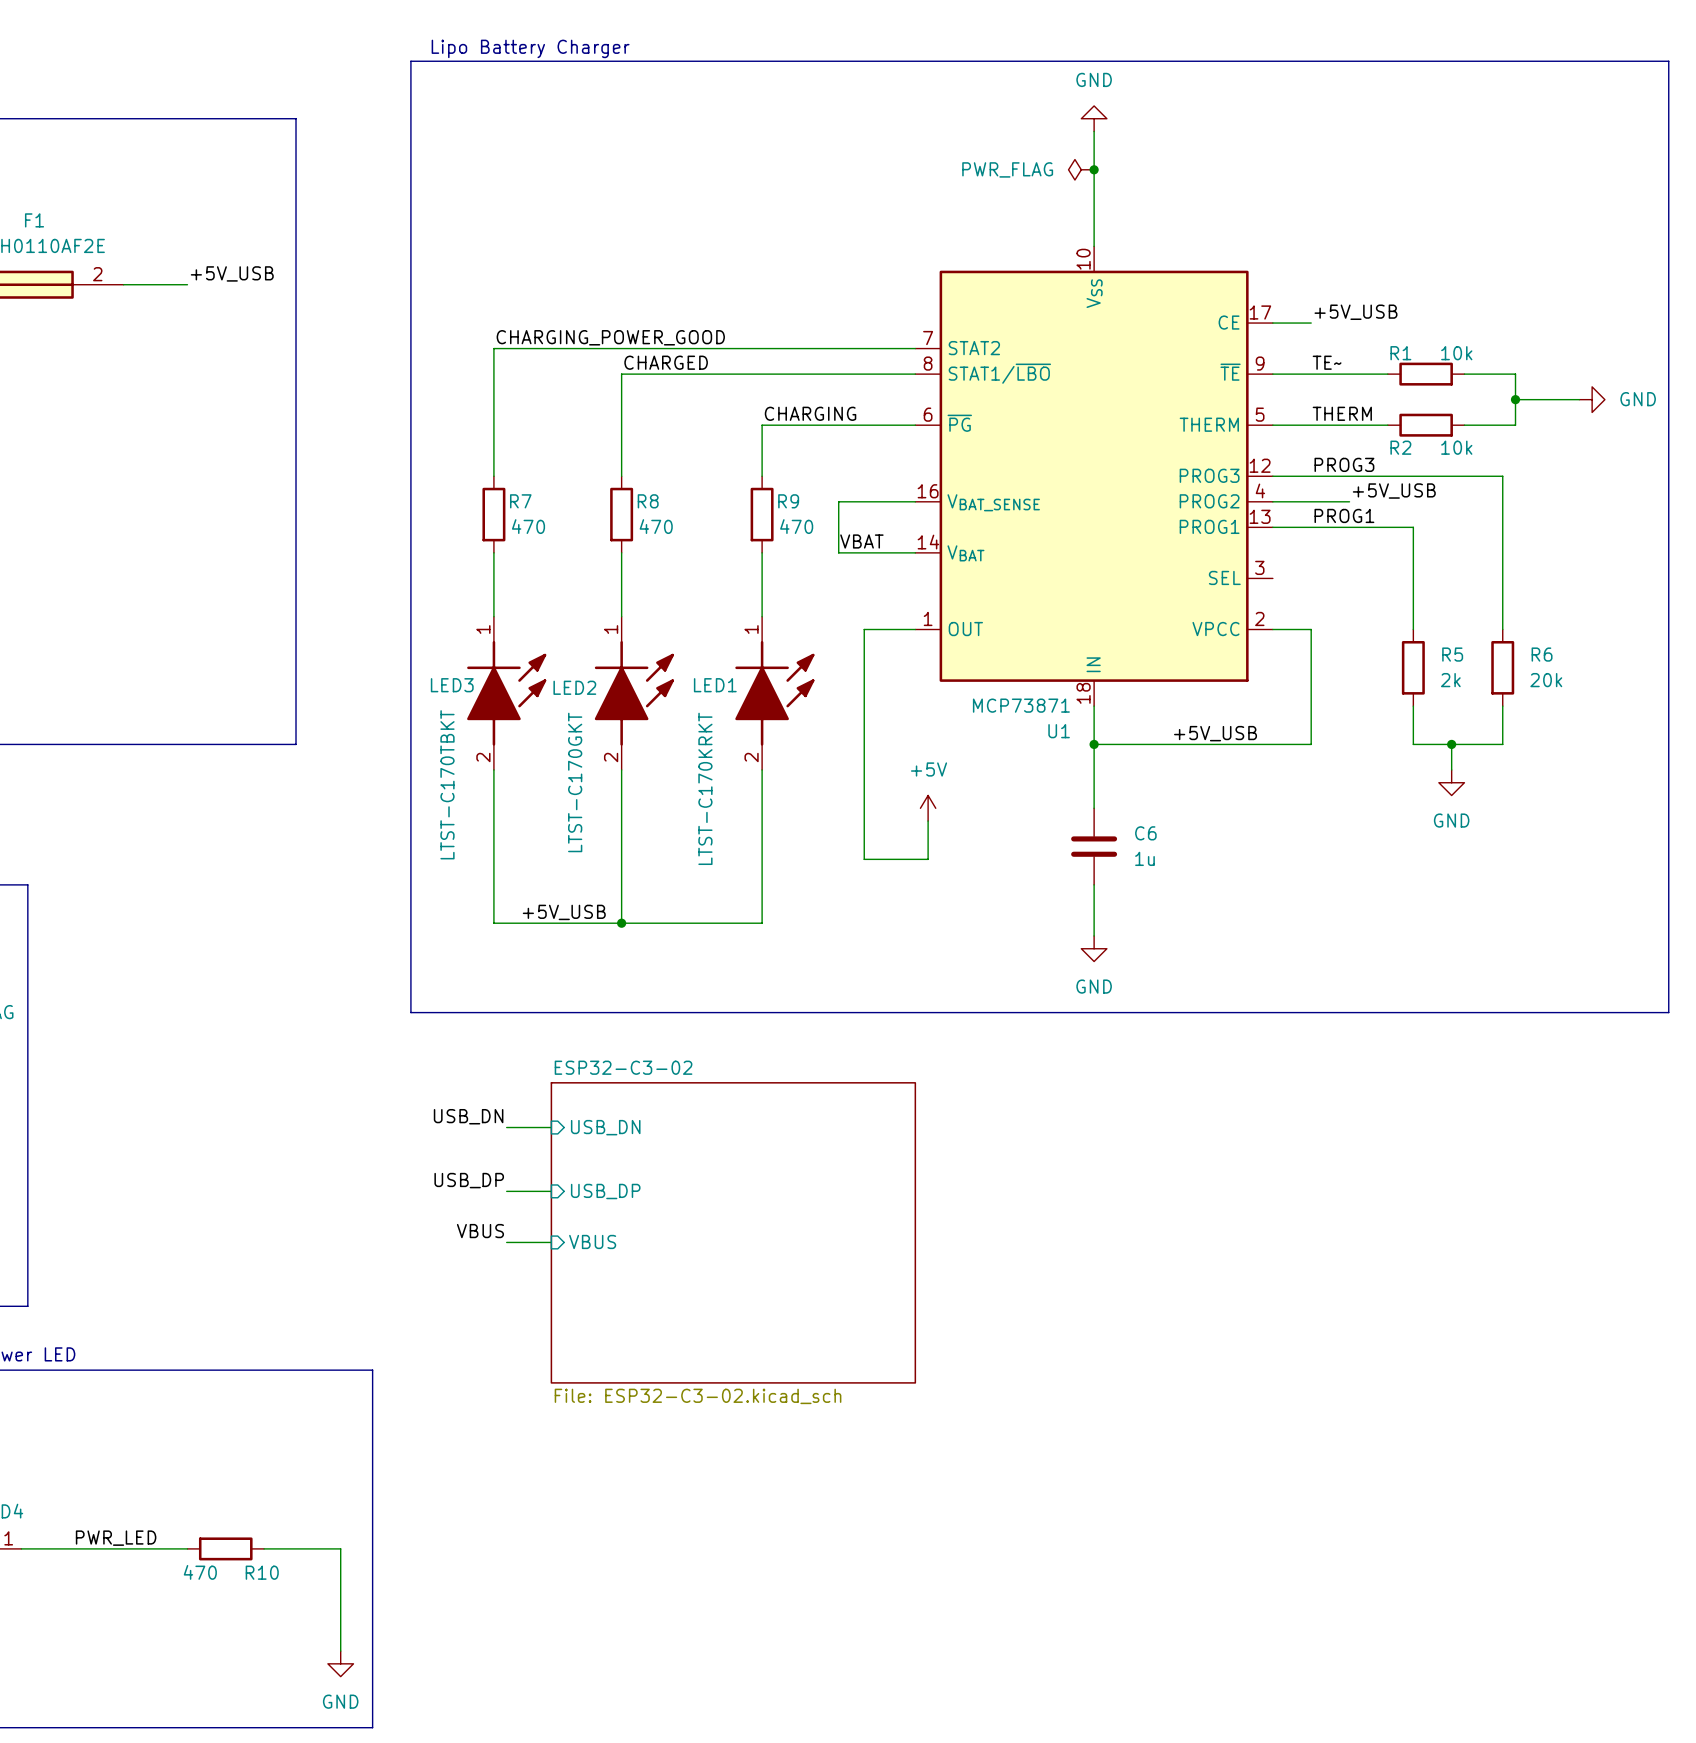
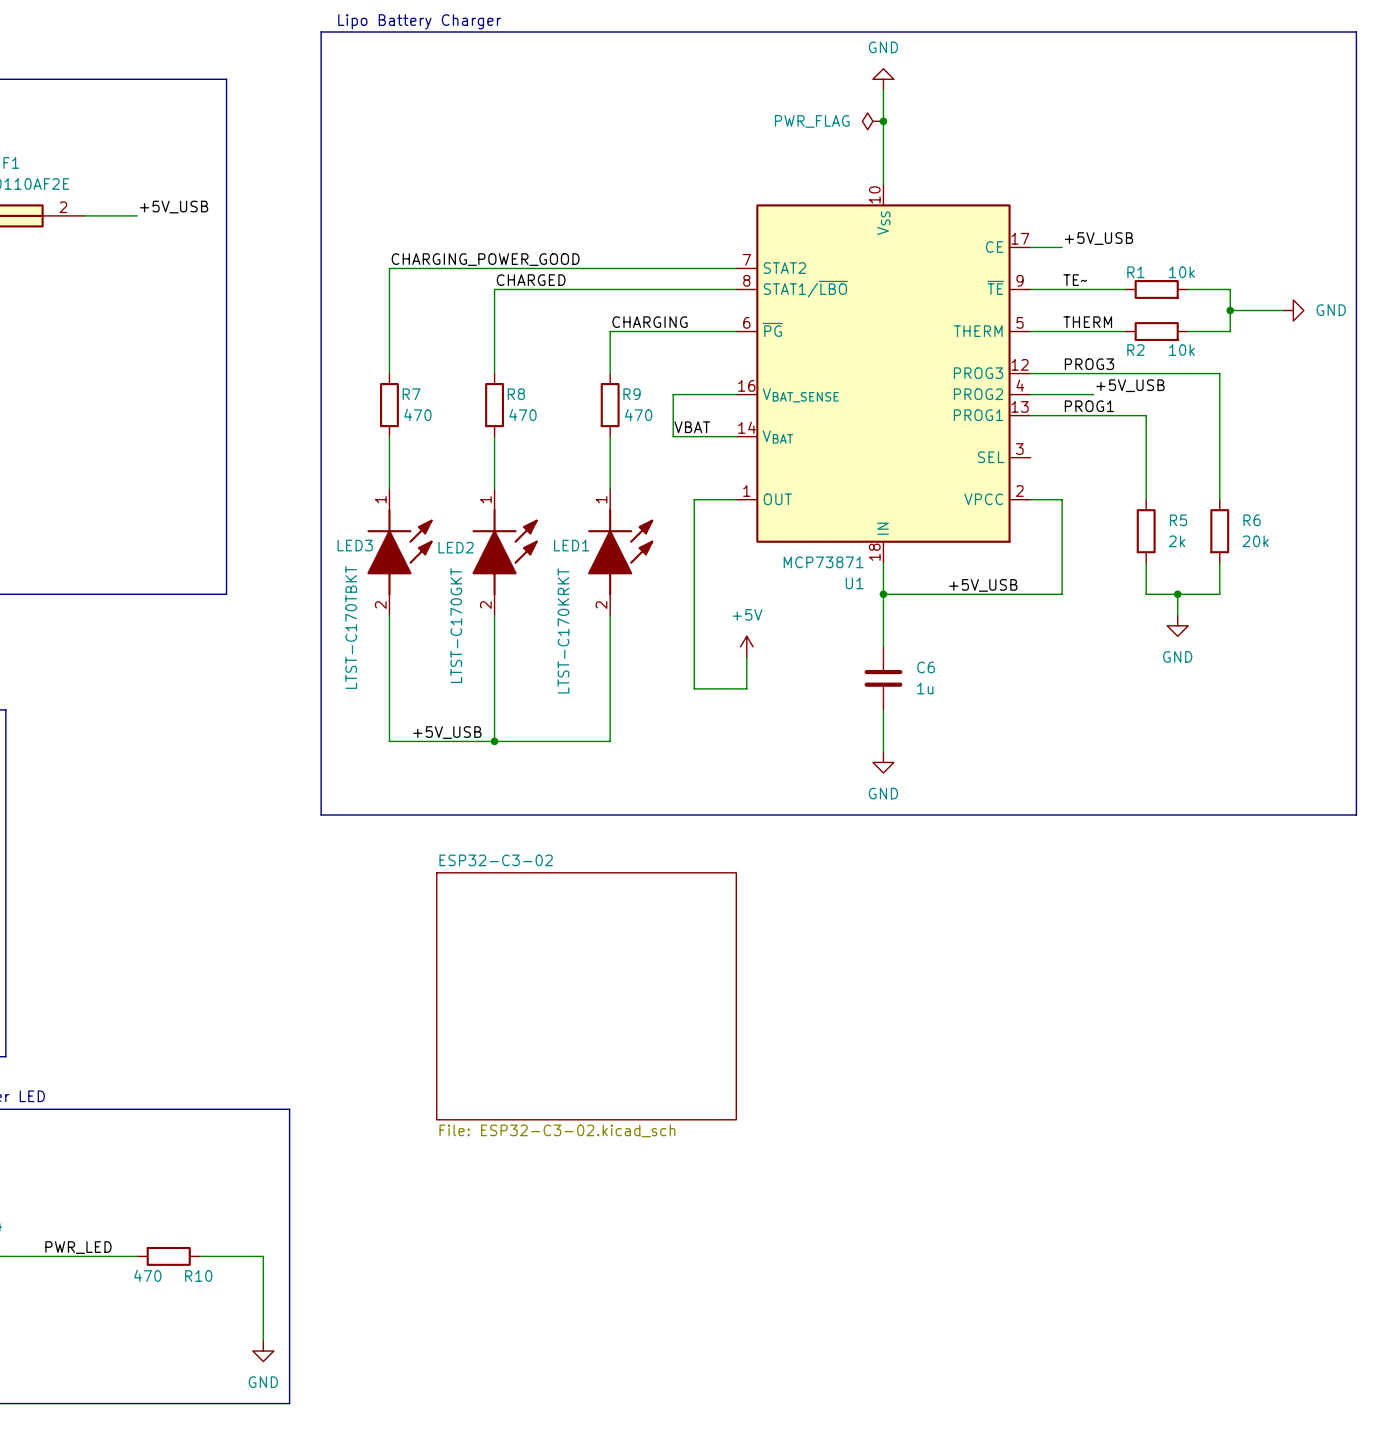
label: USB_DN (468, 1116) -> none
wire: (506, 1127) (551, 1127) -> none
sheet pin: USB_DN (605, 1127) -> none
label: USB_DP (469, 1180) -> none
wire: (506, 1191) (551, 1191) -> none
sheet pin: USB_DP (605, 1191) -> none
label: VBUS (480, 1231) -> none
sheet pin: VBUS (592, 1241) -> none
wire: (506, 1242) (551, 1242) -> none

